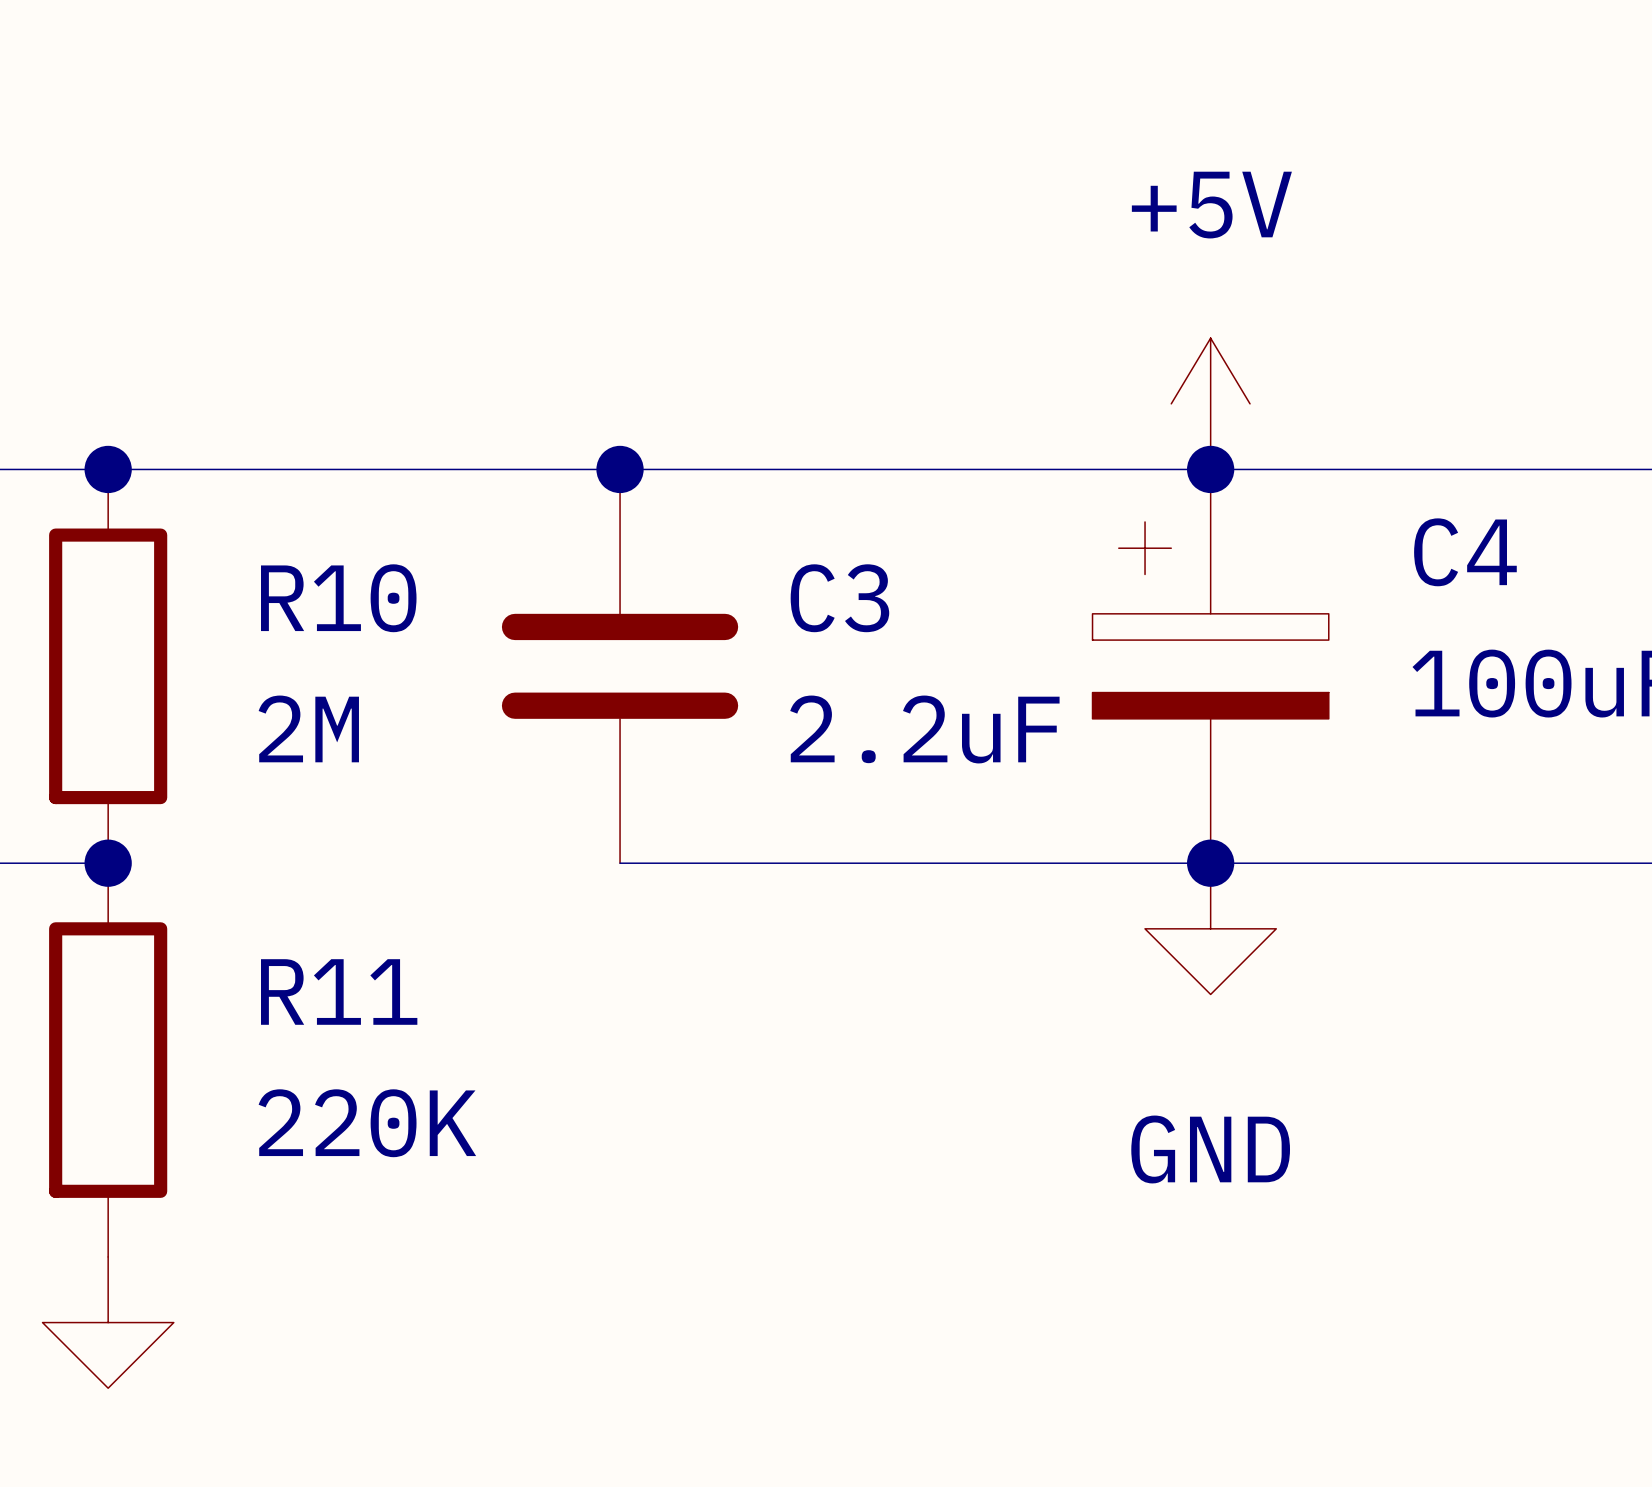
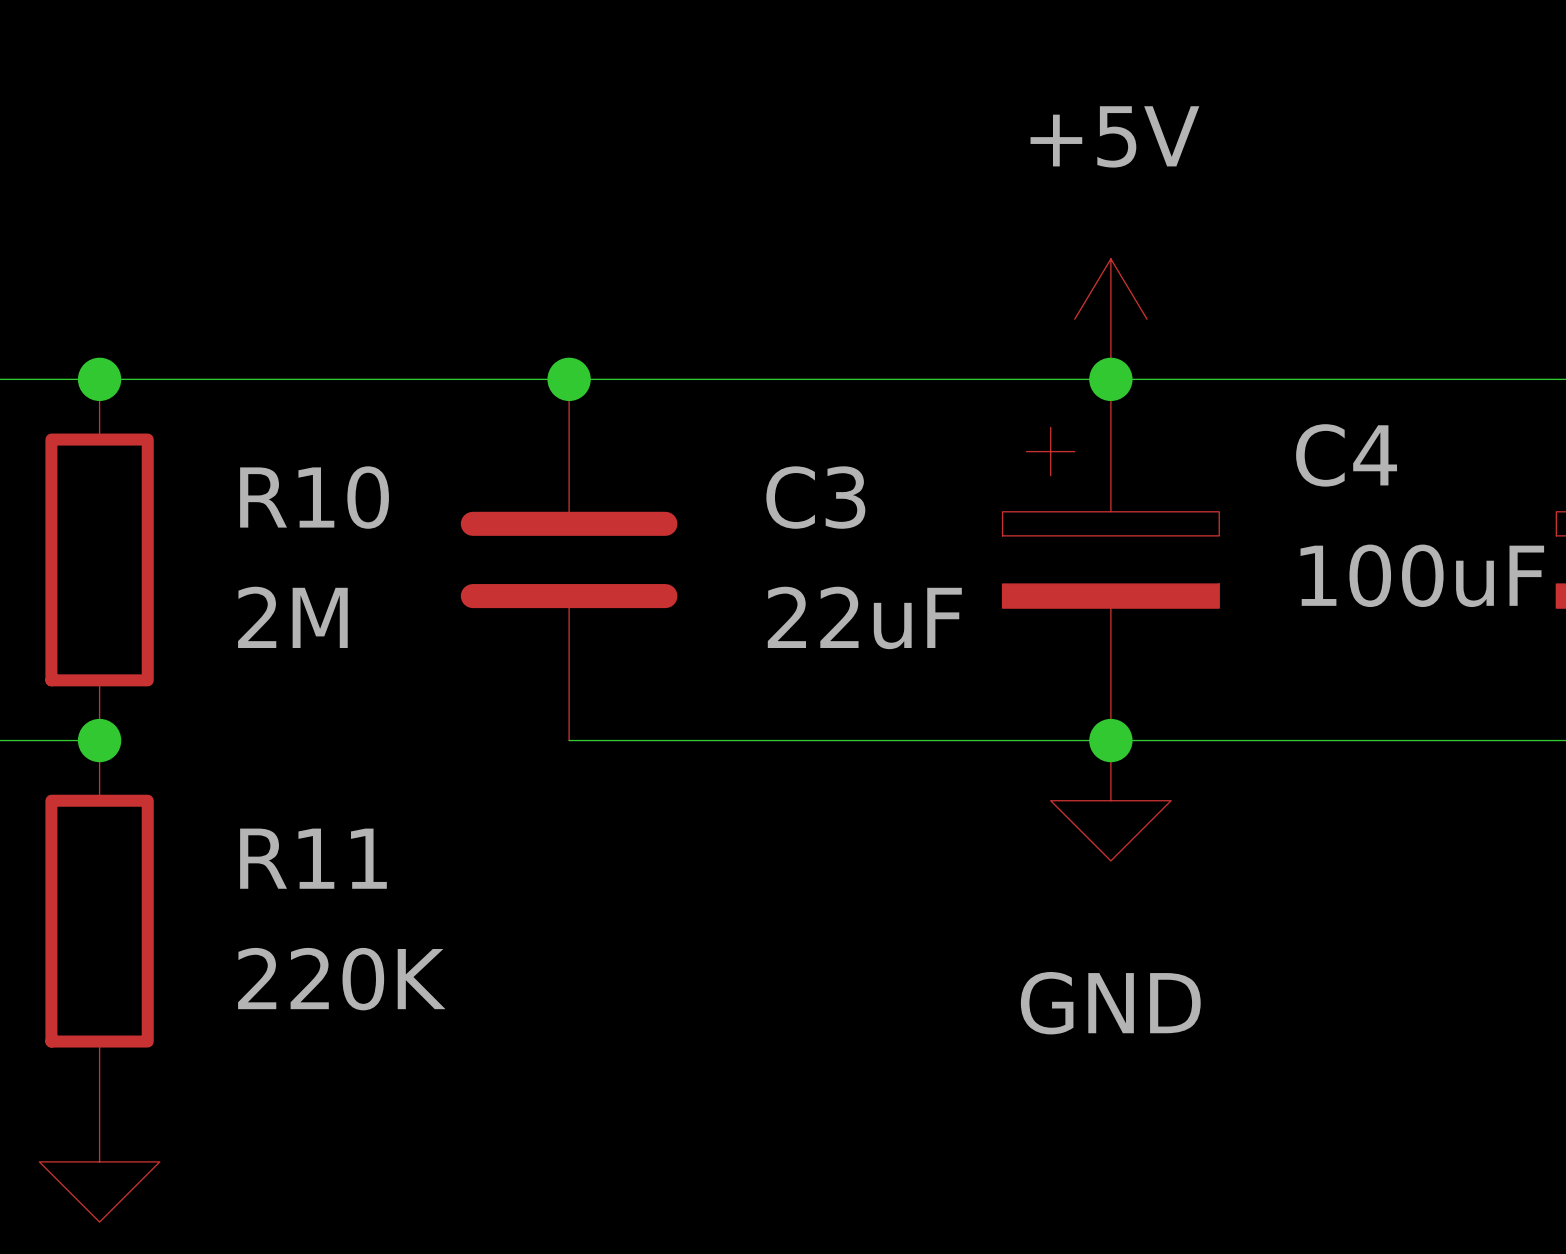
C3 name position: C3 (839, 598) -> C3 (815, 497)
C3 value: 2.2uF (924, 729) -> 22uF (864, 617)

